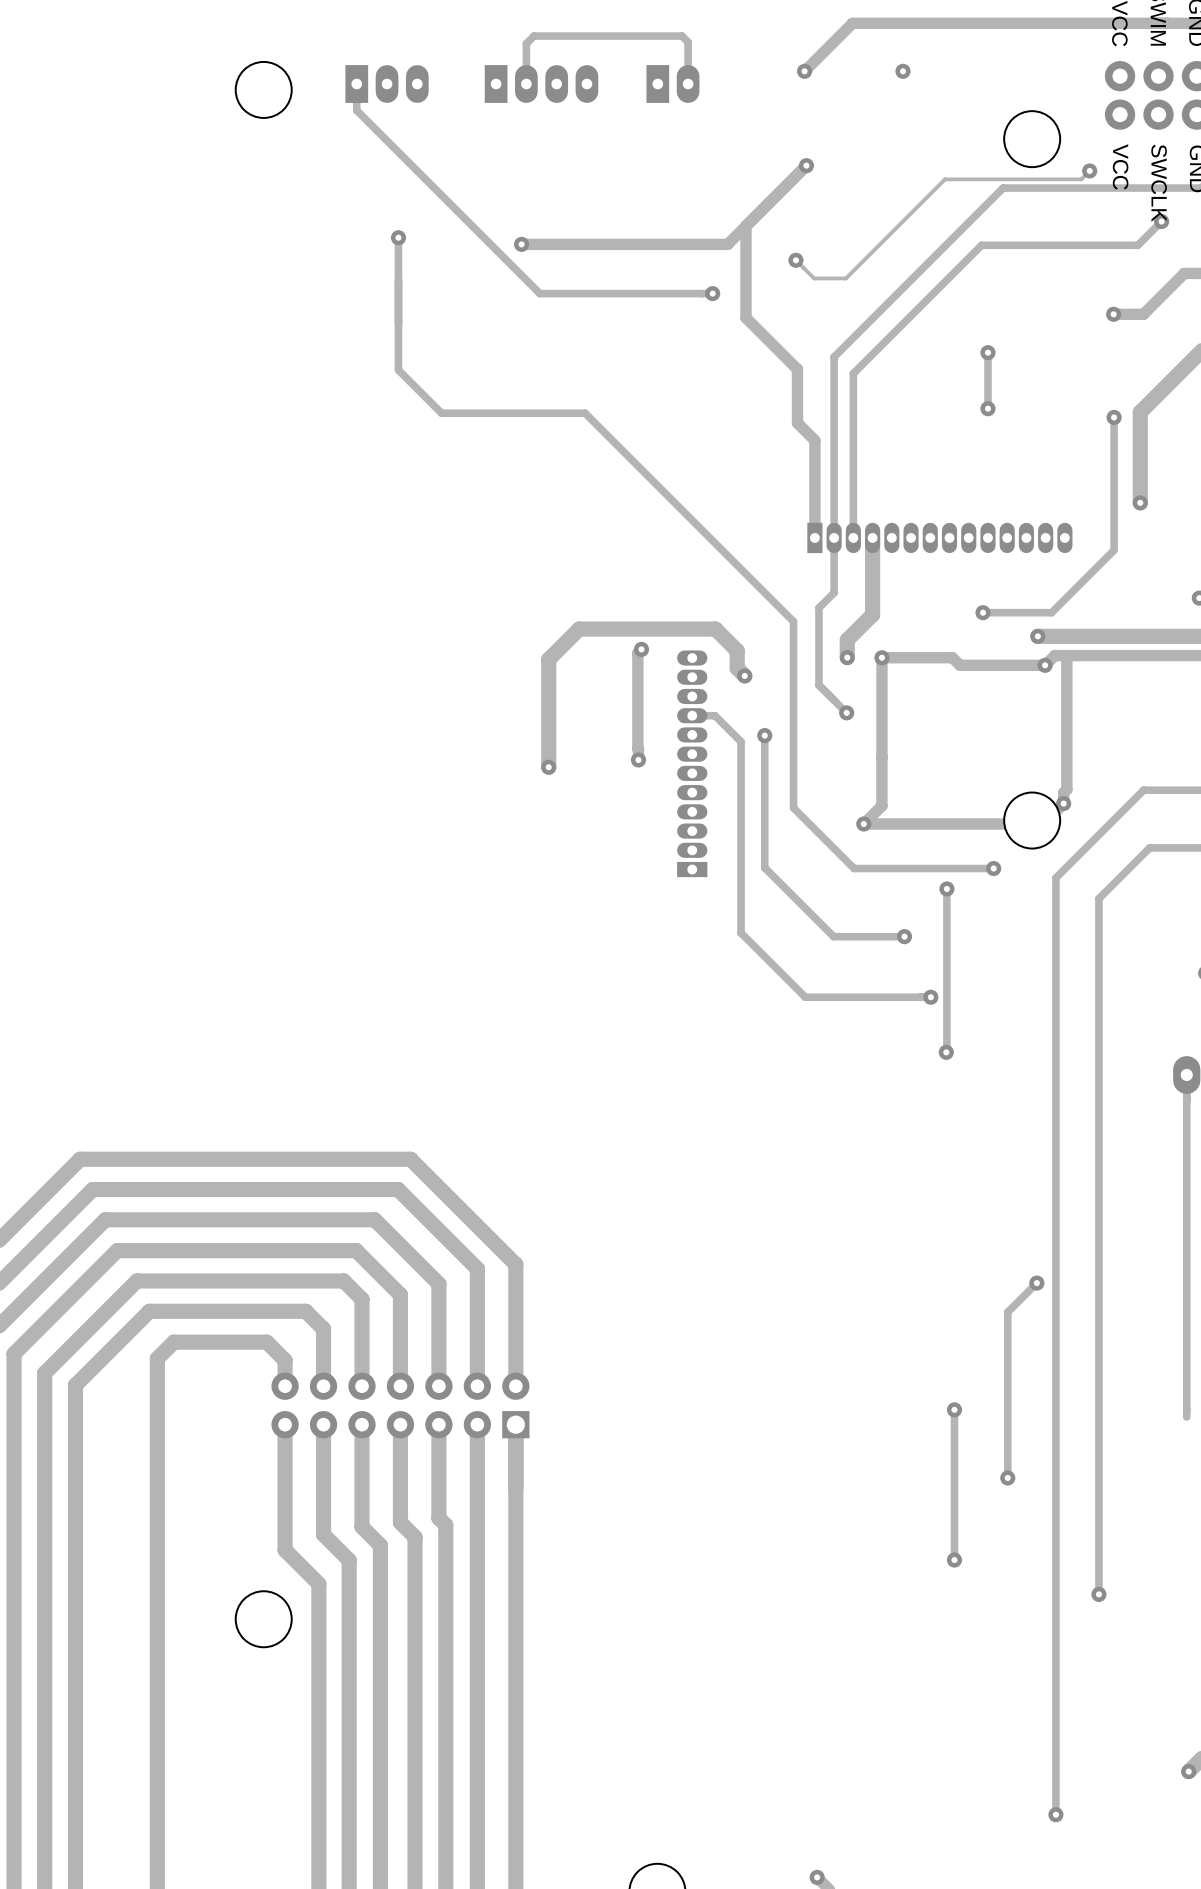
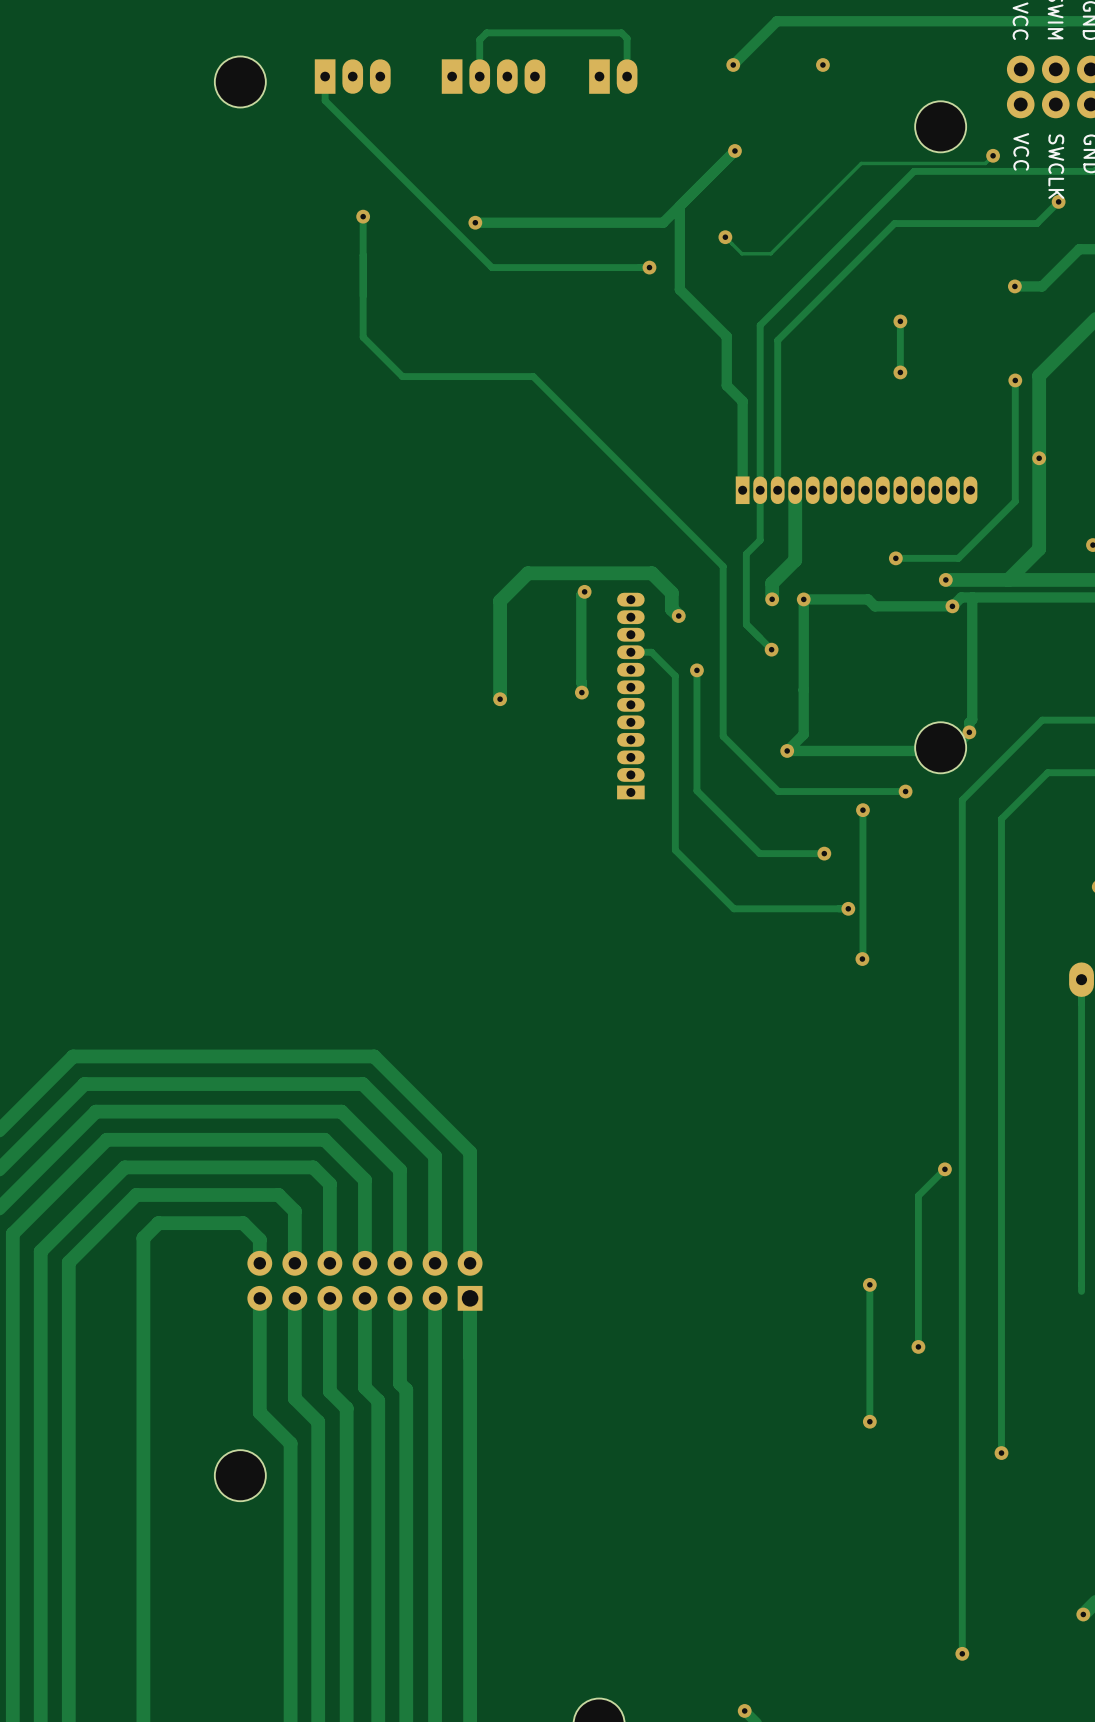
track: none -> (1039, 458) (1039, 549) (1008, 579)

